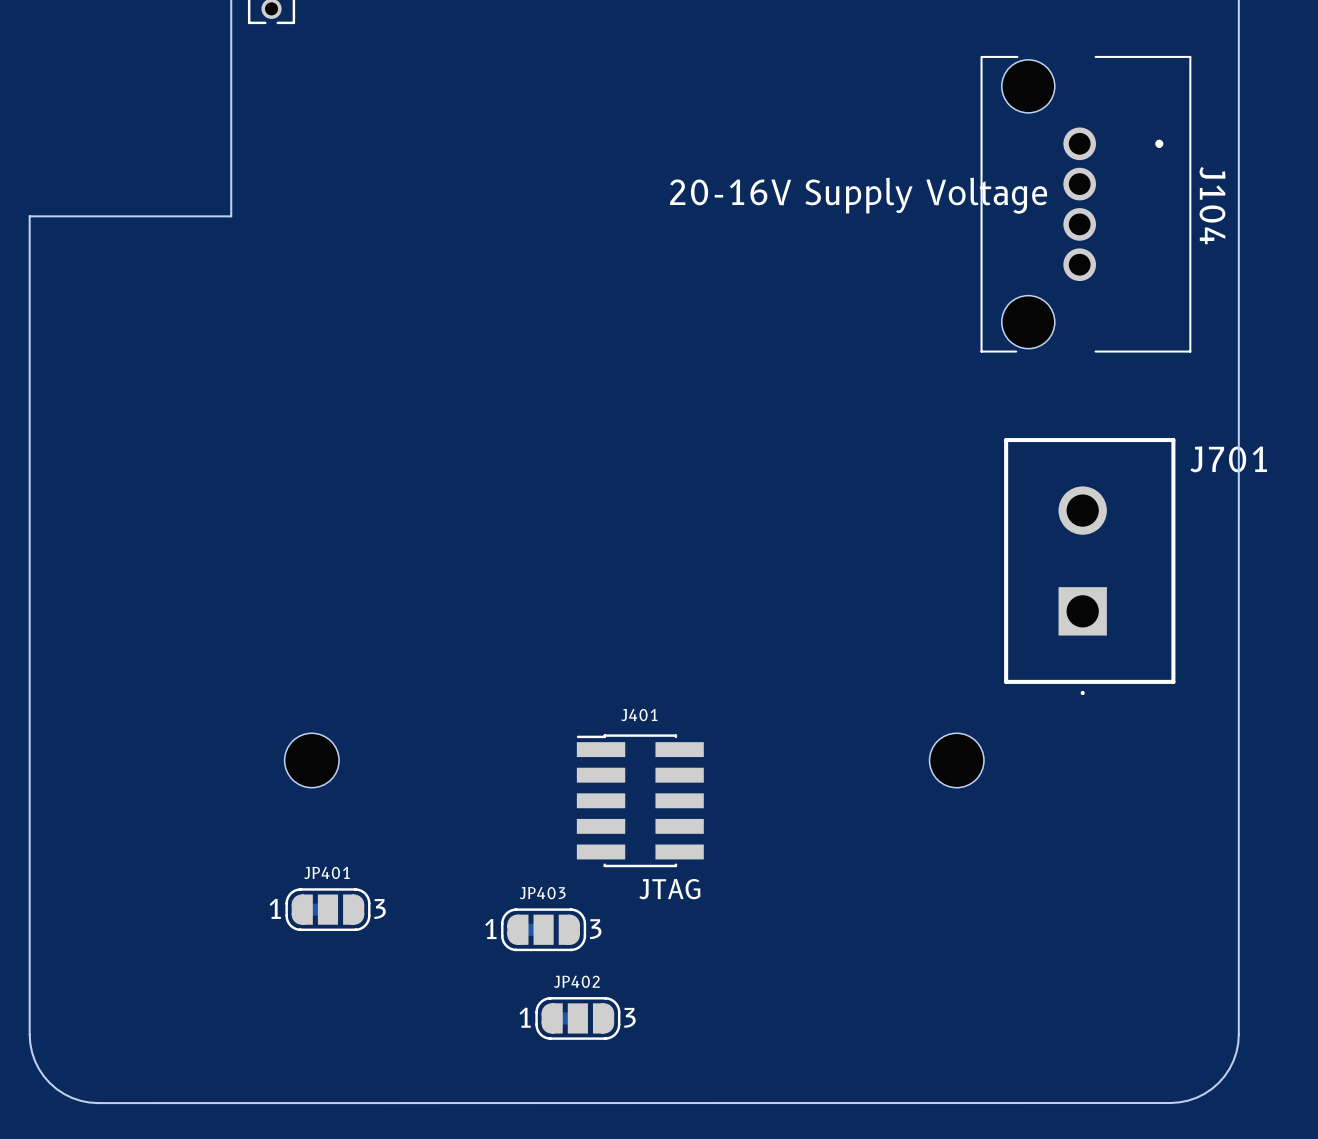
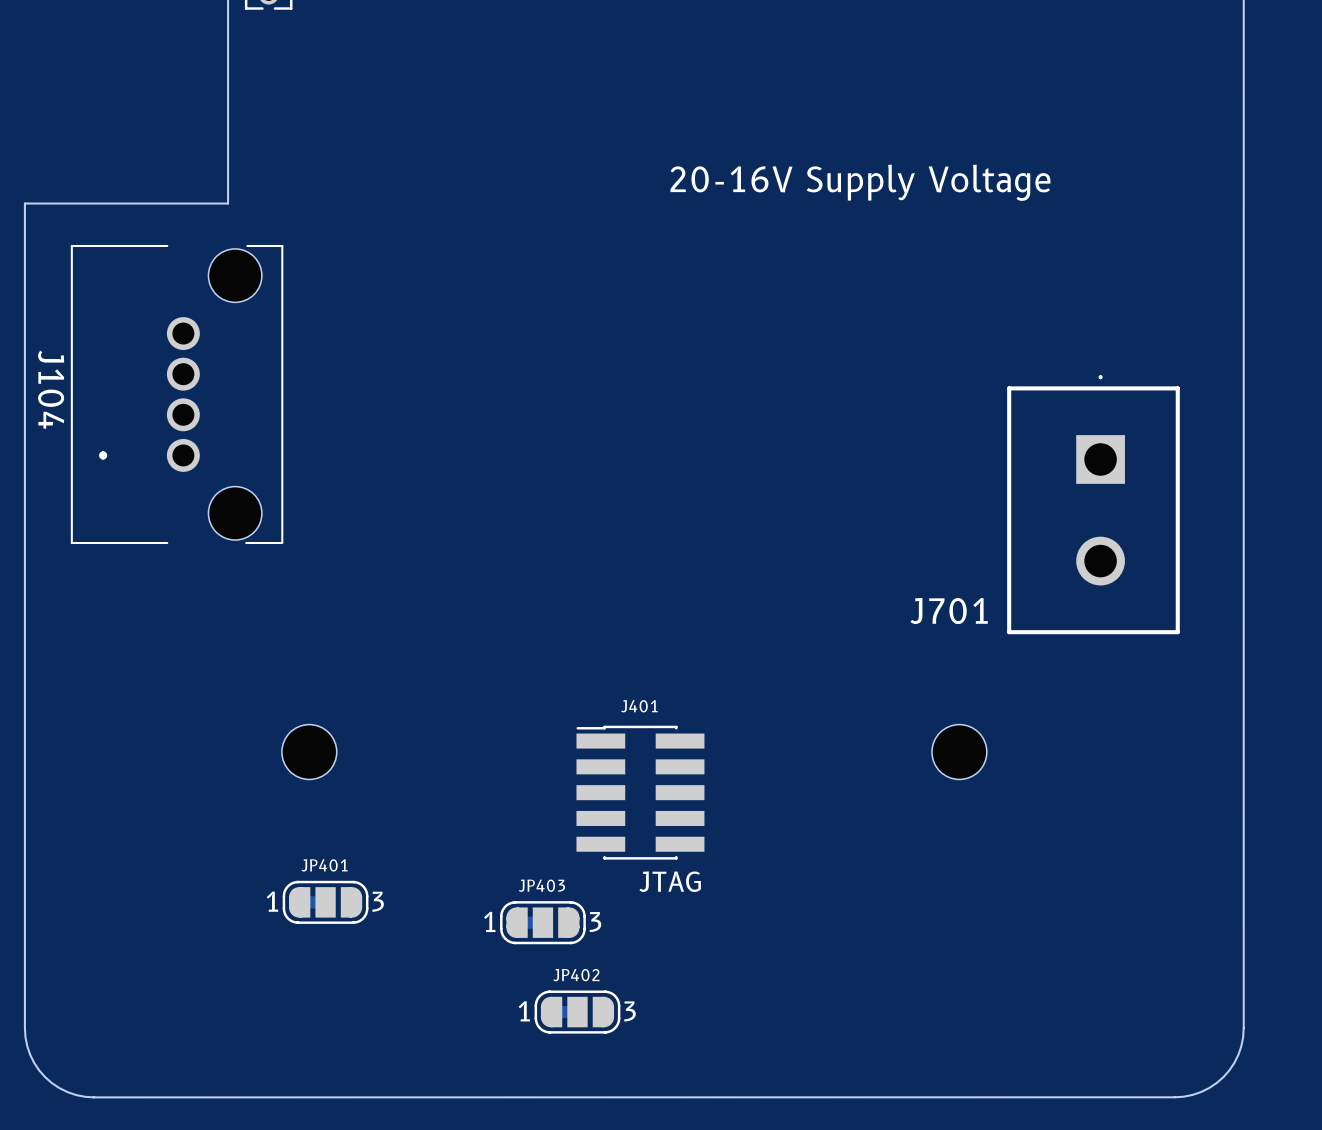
J104 rotation: 0° (1085, 204) -> 180° (177, 394)
J104 position: (1085, 204) -> (177, 394)
J701 rotation: 0° (1089, 566) -> 180° (1093, 504)

